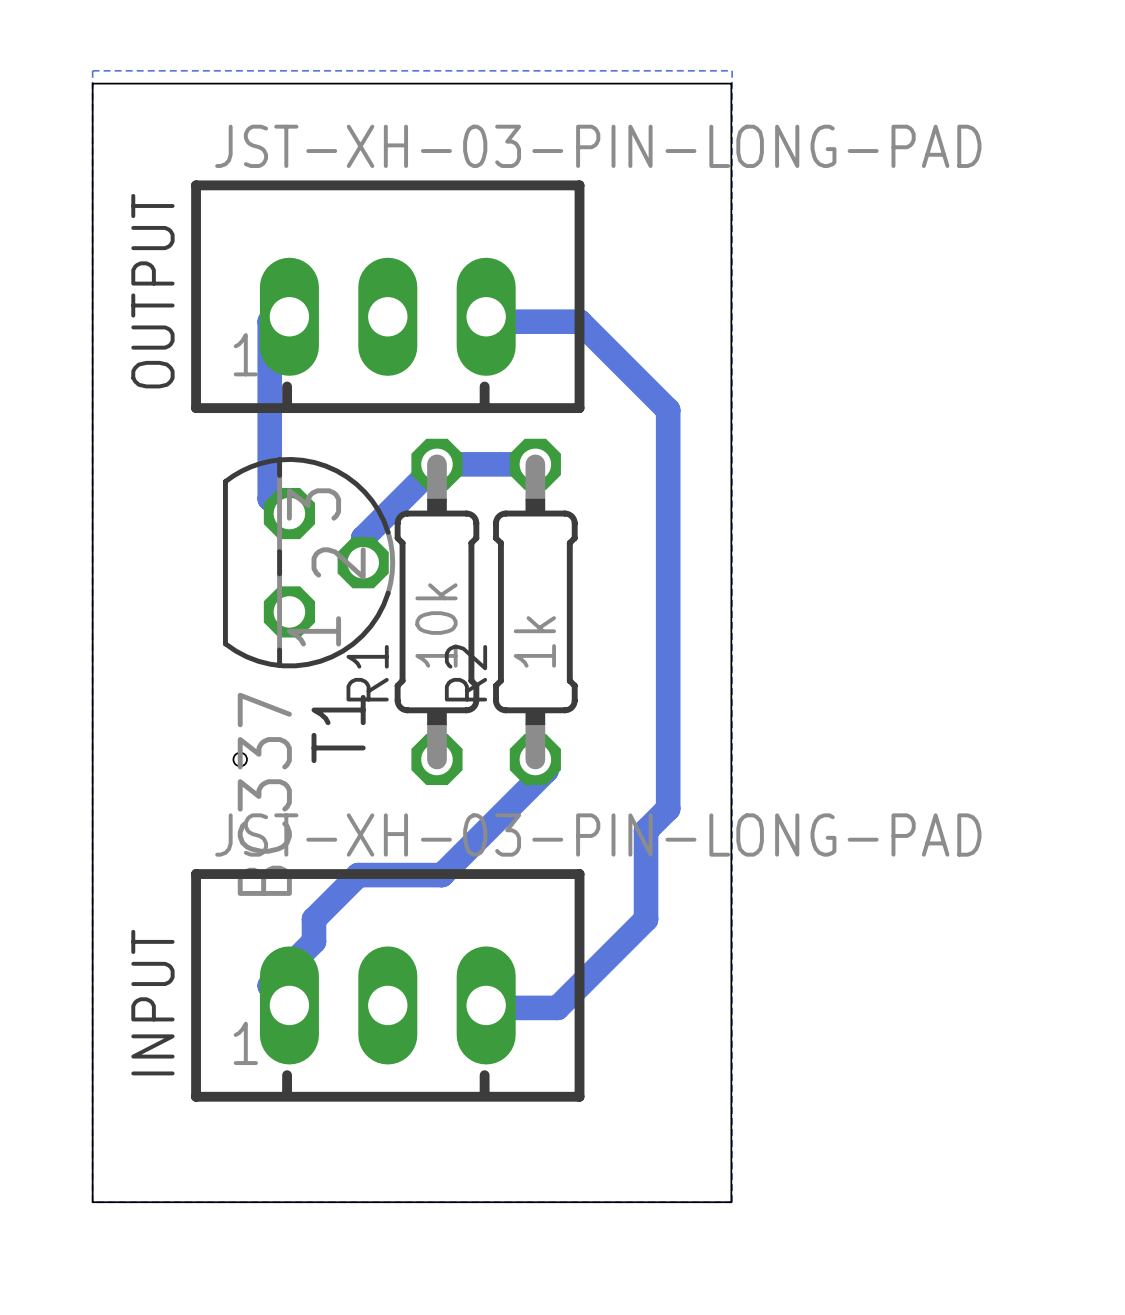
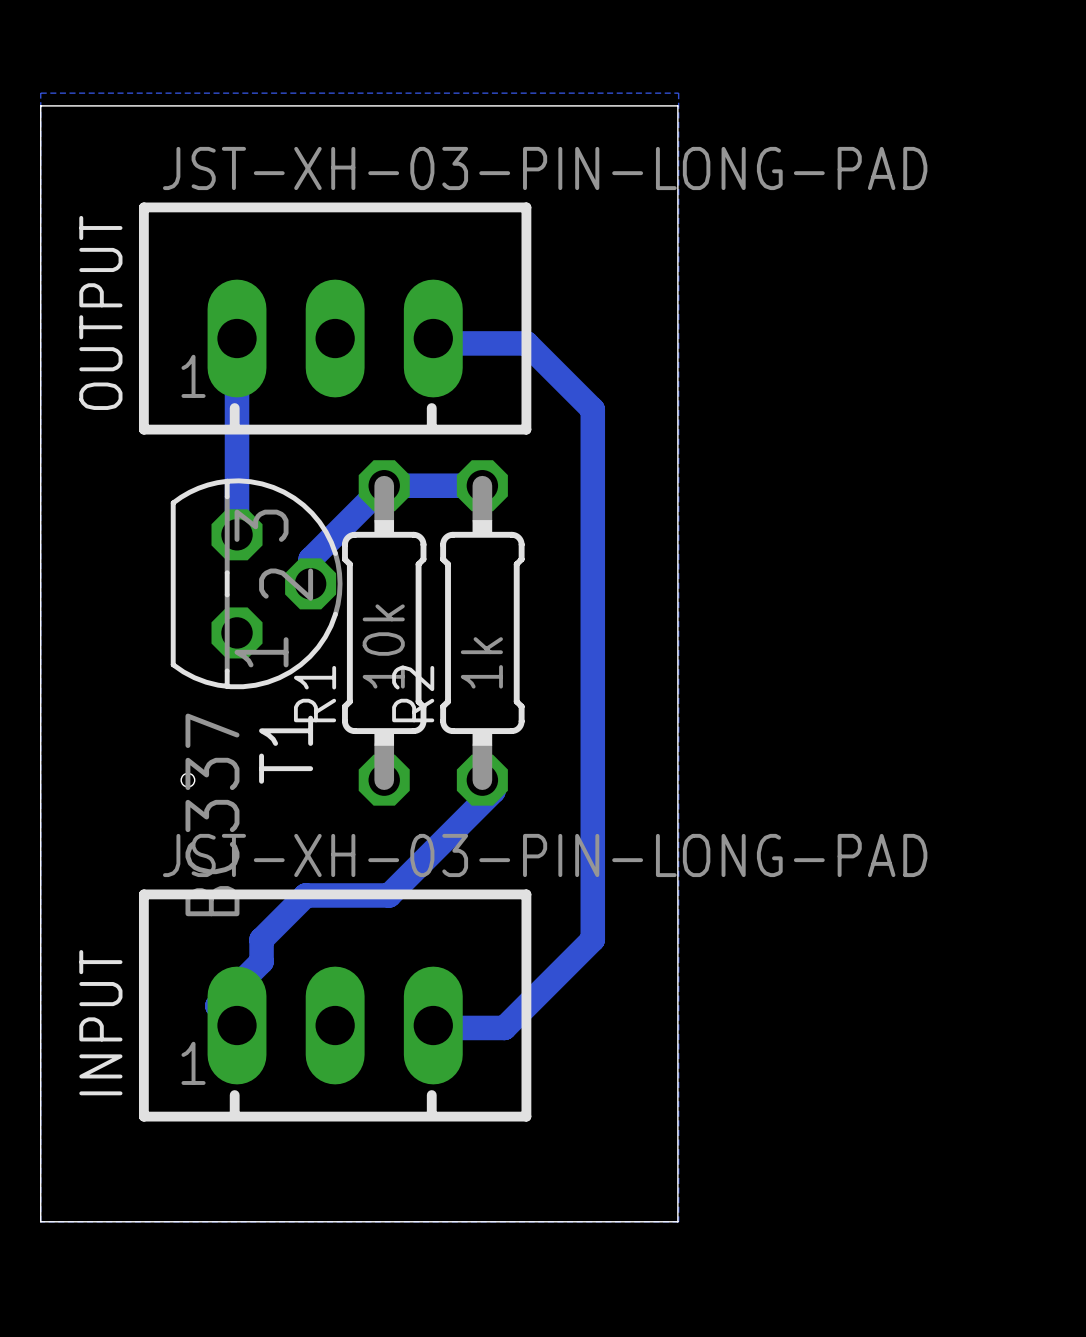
bottom track: (289, 316) (269, 321) (269, 498) (289, 513) -> (237, 338) (237, 534)
bottom track: (646, 388) (668, 410) (668, 808) (646, 830) -> (592, 409) (592, 851)

